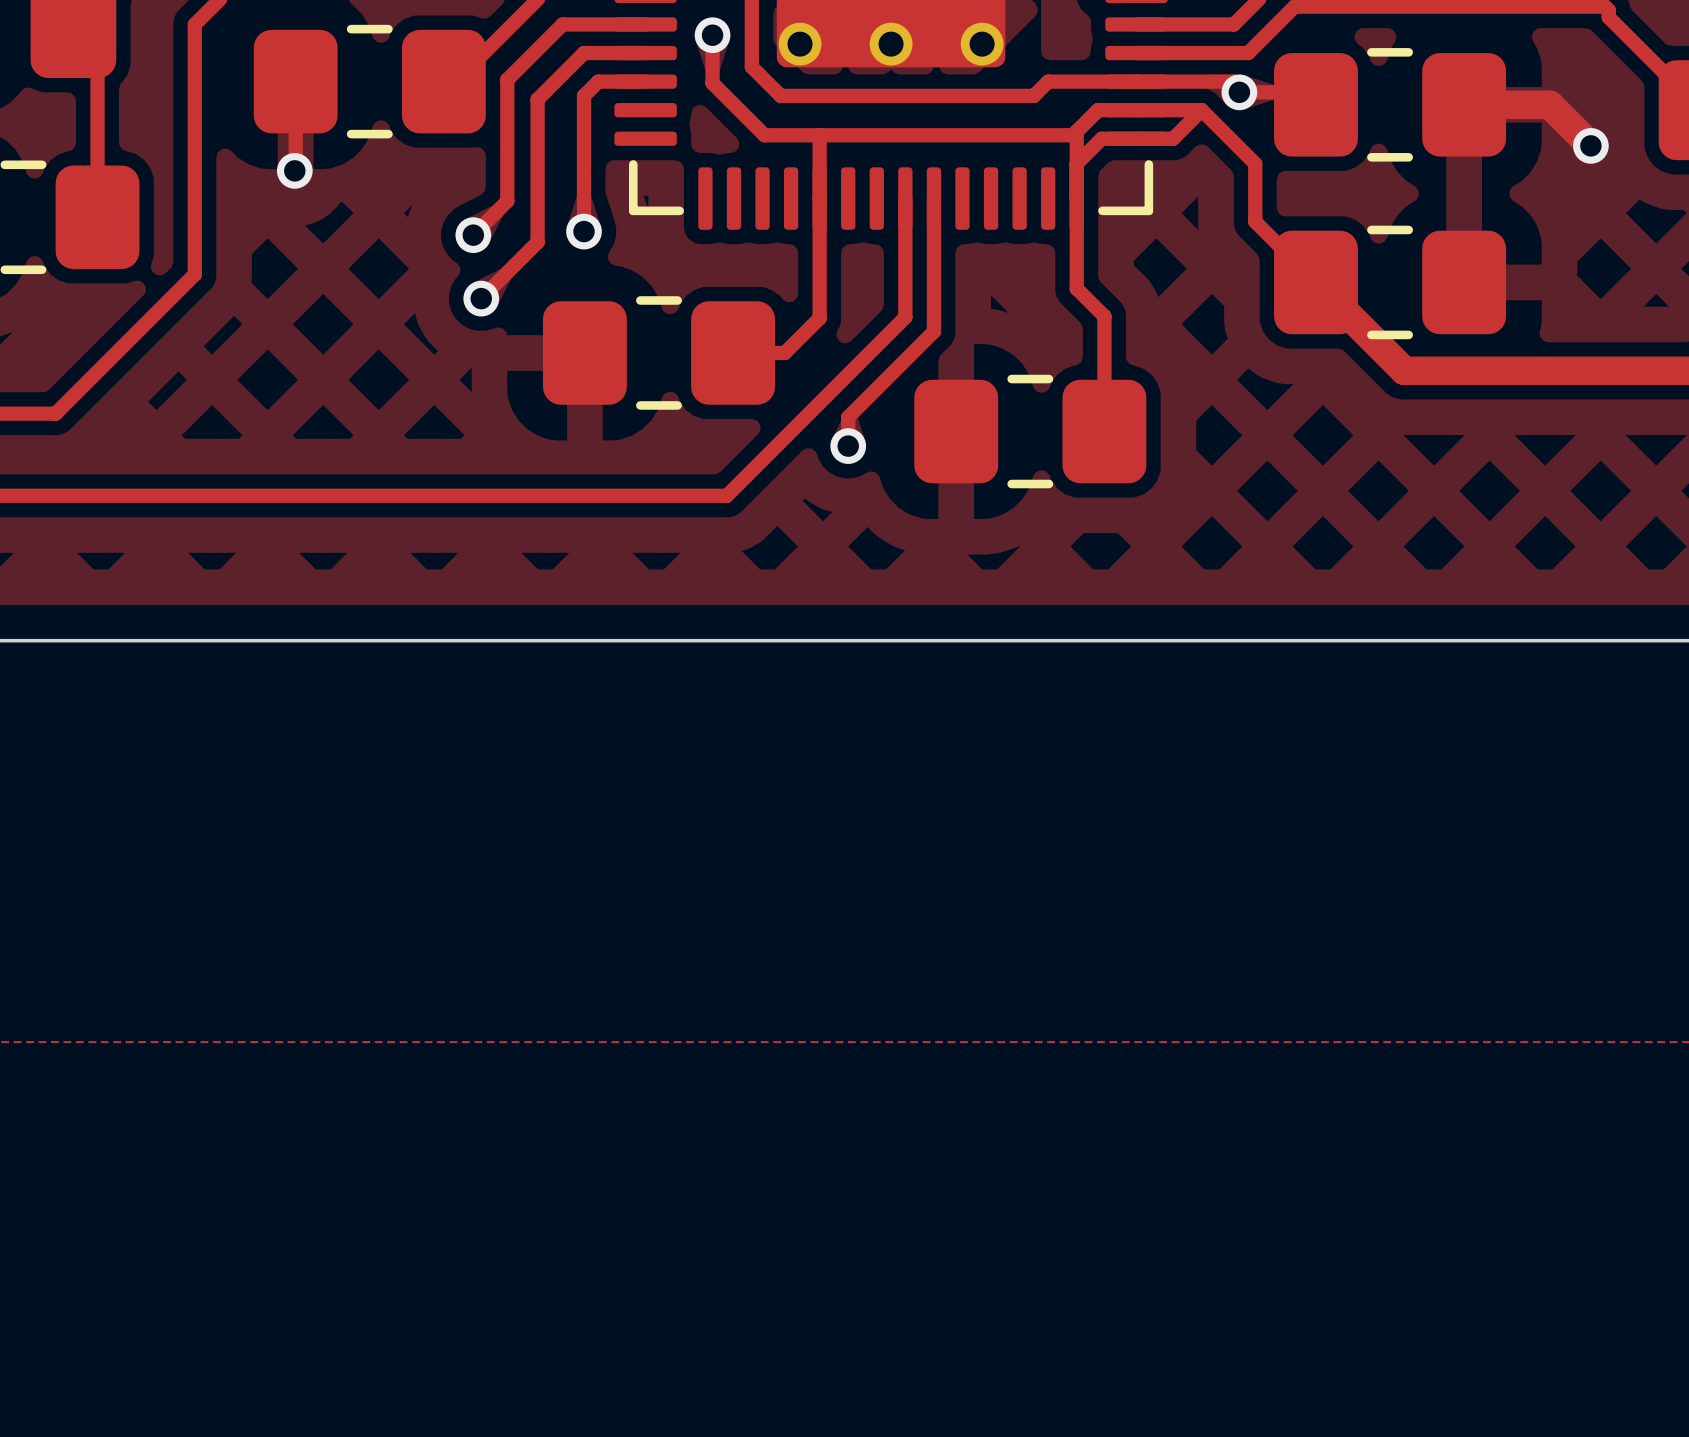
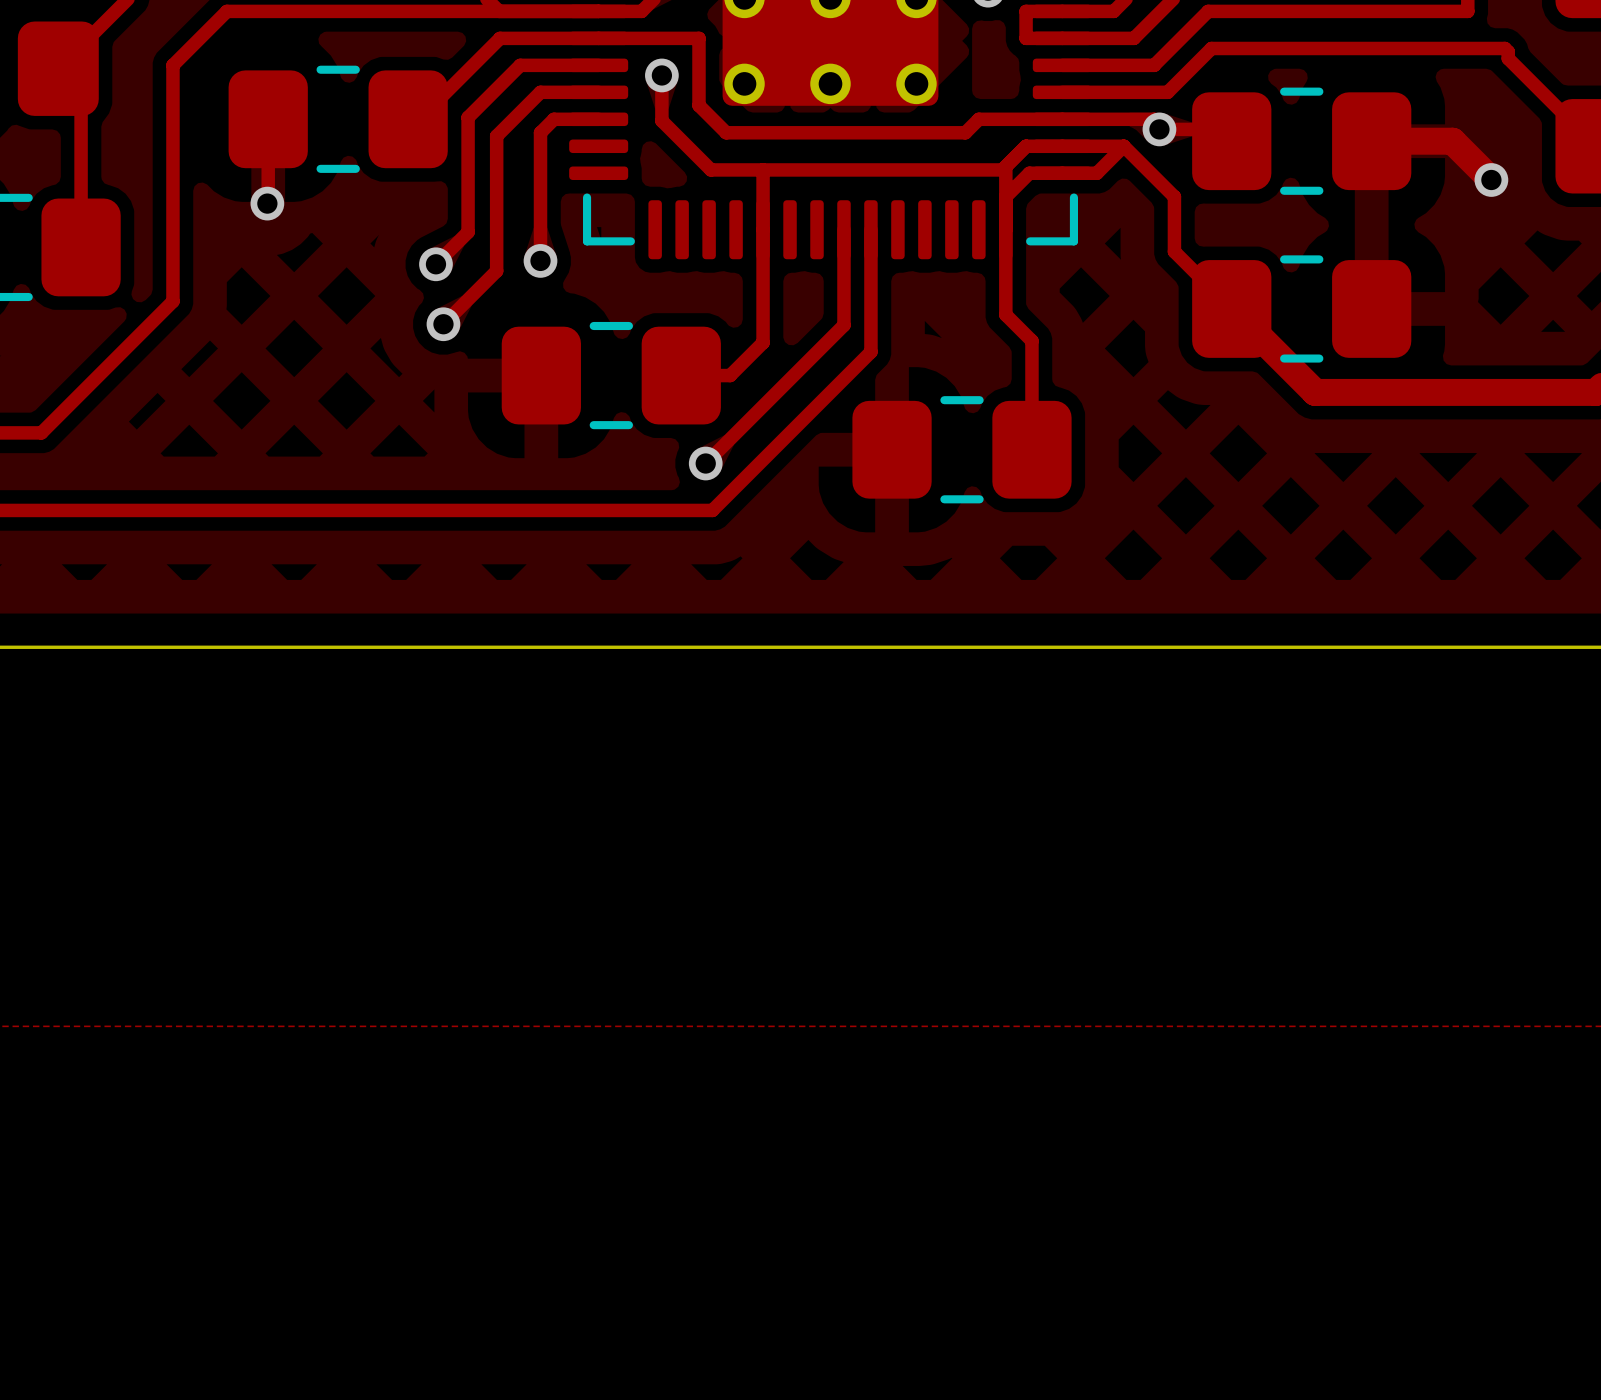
track: (905, 299) (905, 317) (726, 495) -> (870, 351) (712, 510) (675, 510)
track: none -> (843, 325) (705, 463)
track: (933, 327) (933, 331) (848, 417) (848, 446) -> none
via position: (848, 446) -> (705, 463)

